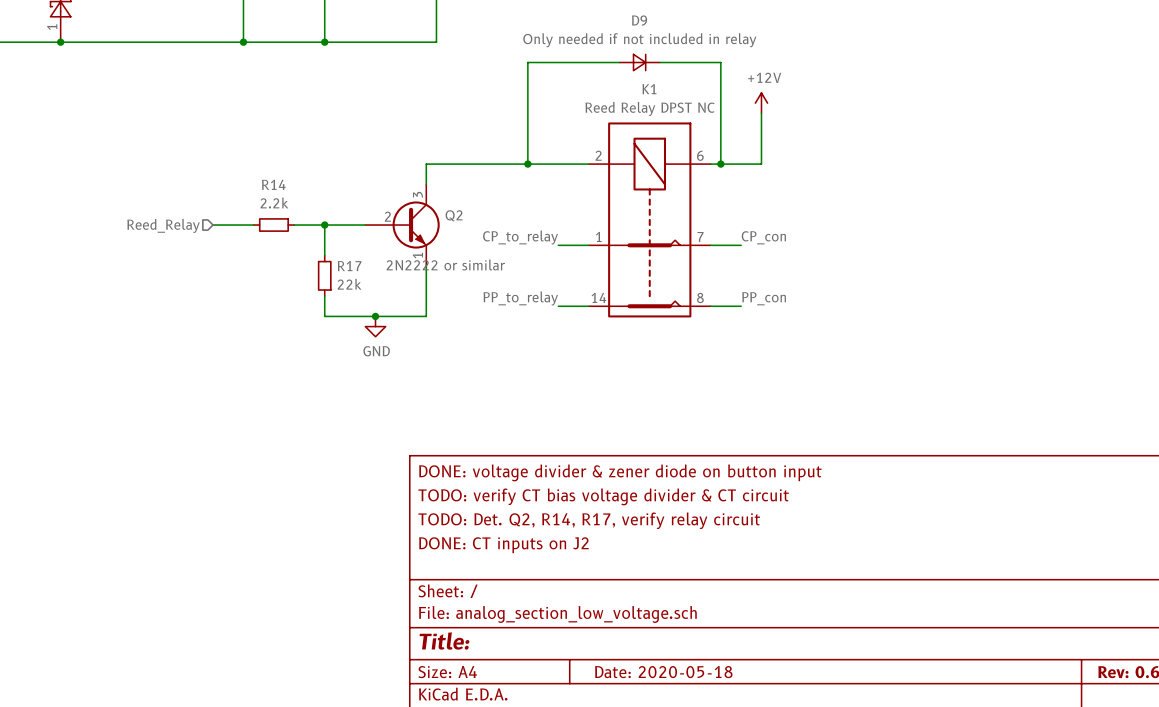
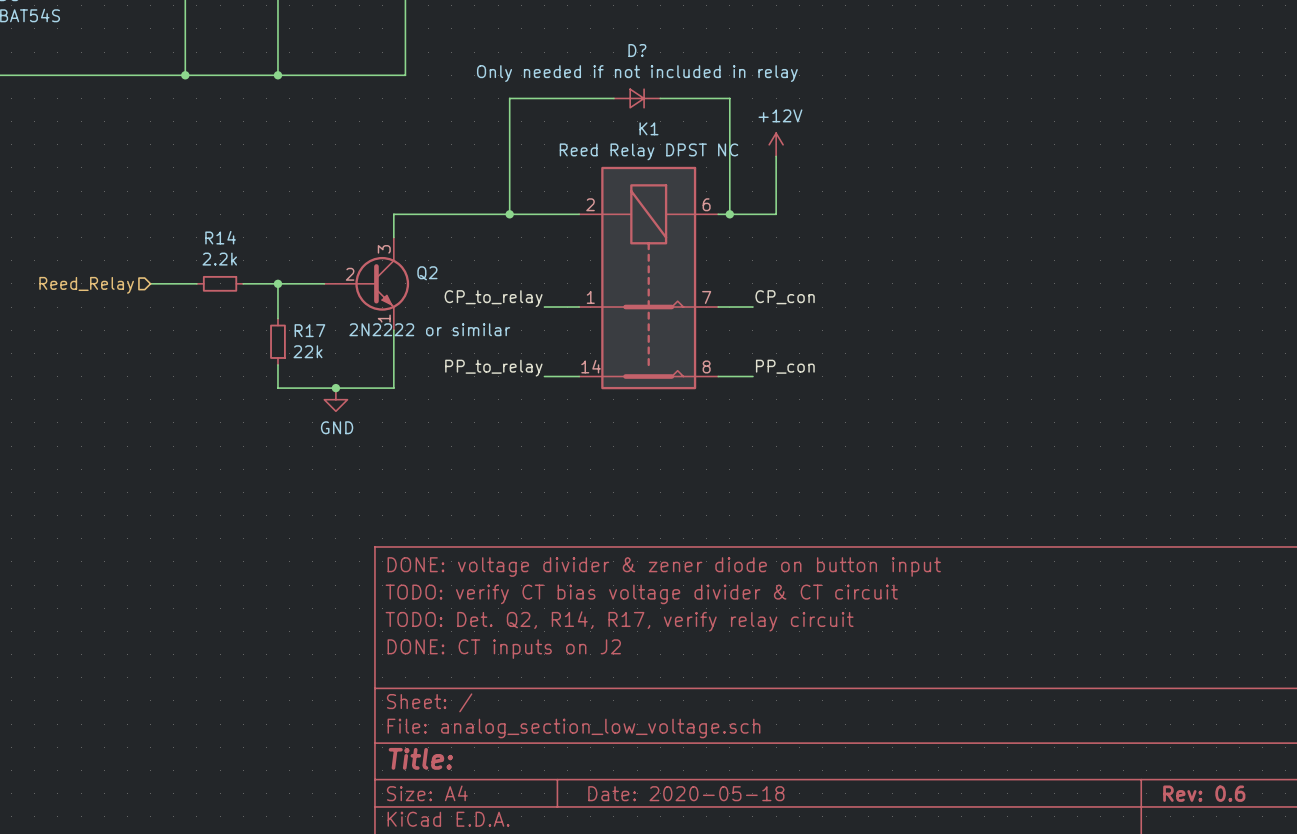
D9 name: D9 (639, 20) -> D? (637, 50)

